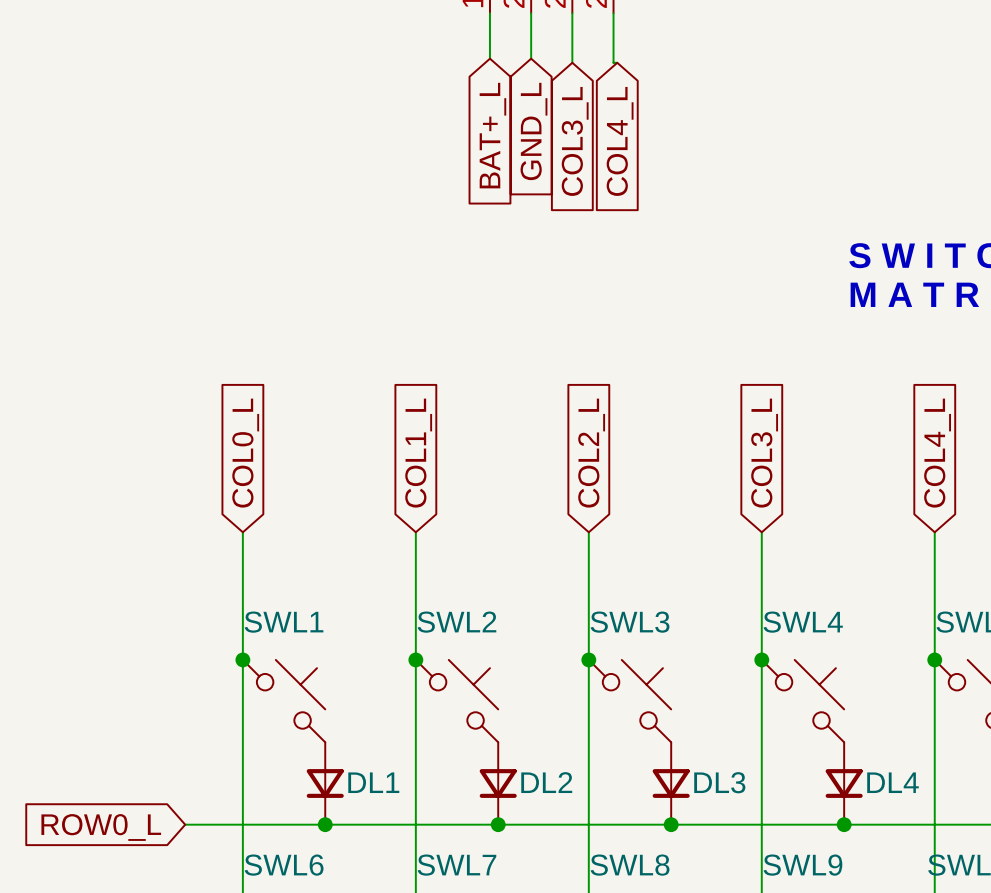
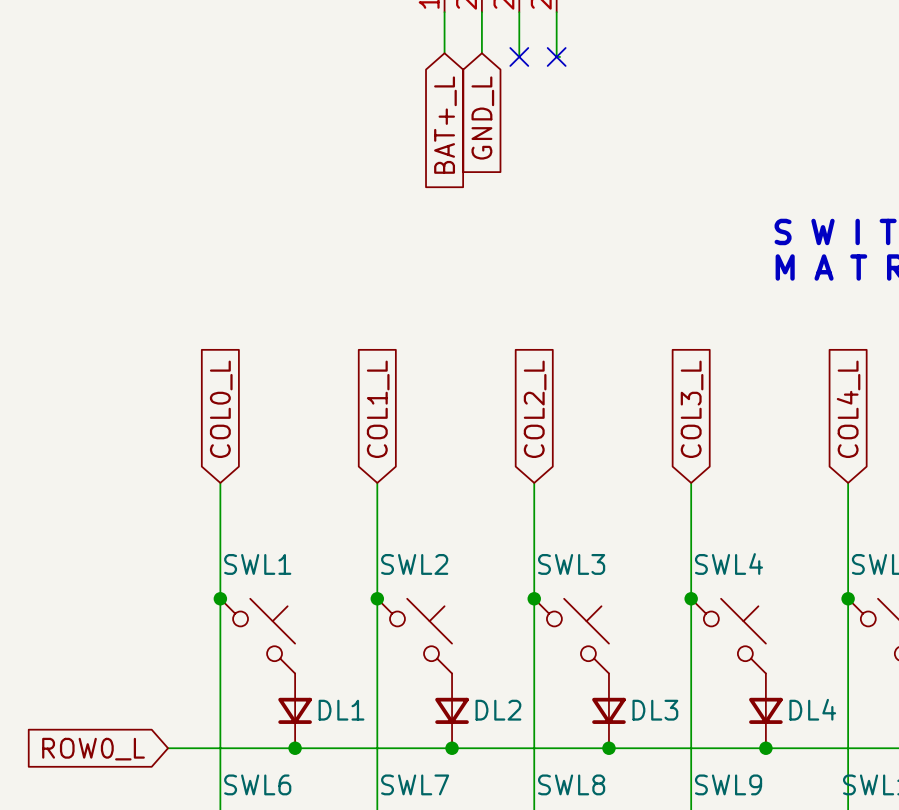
no-connect mark: none -> (519, 56)
no-connect mark: none -> (556, 56)
global label: COL3_L (575, 141) -> none
global label: COL4_L (620, 141) -> none

